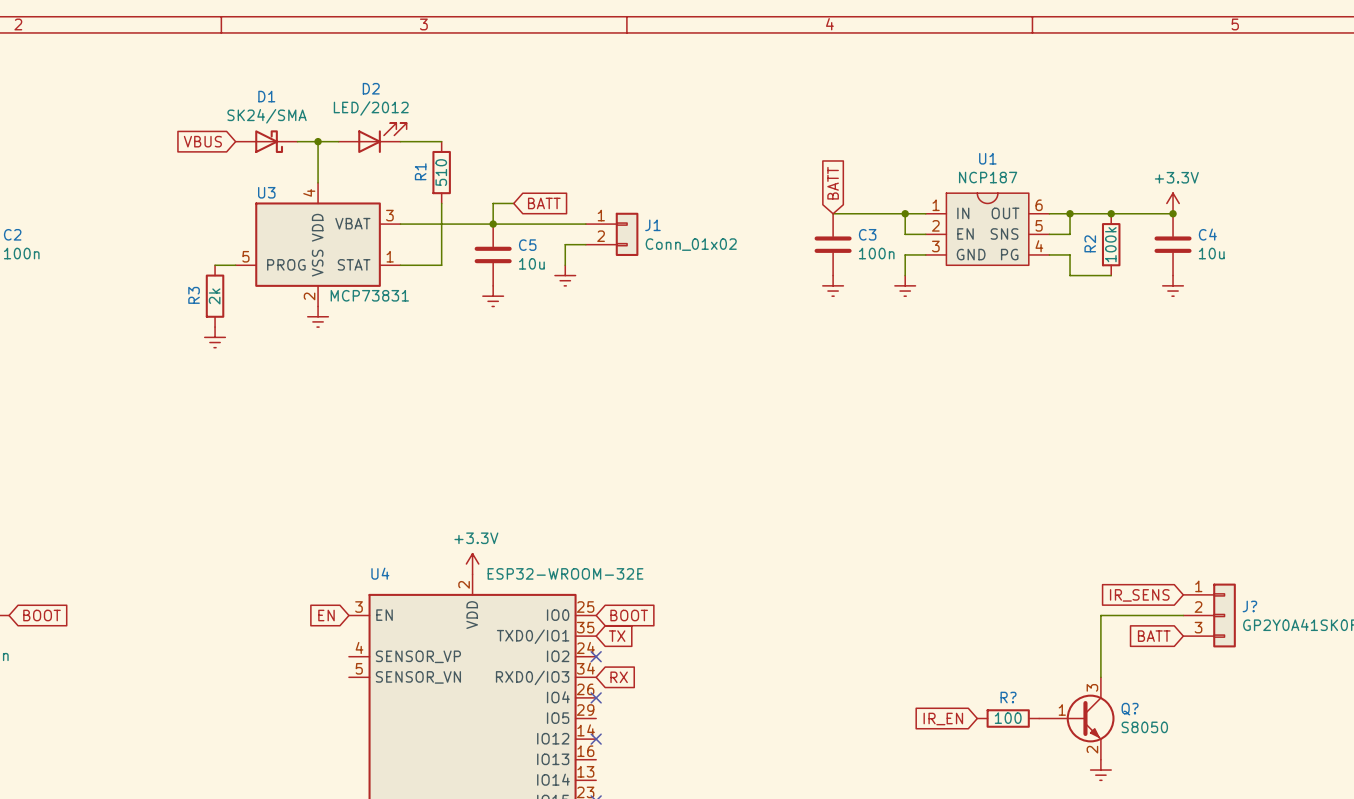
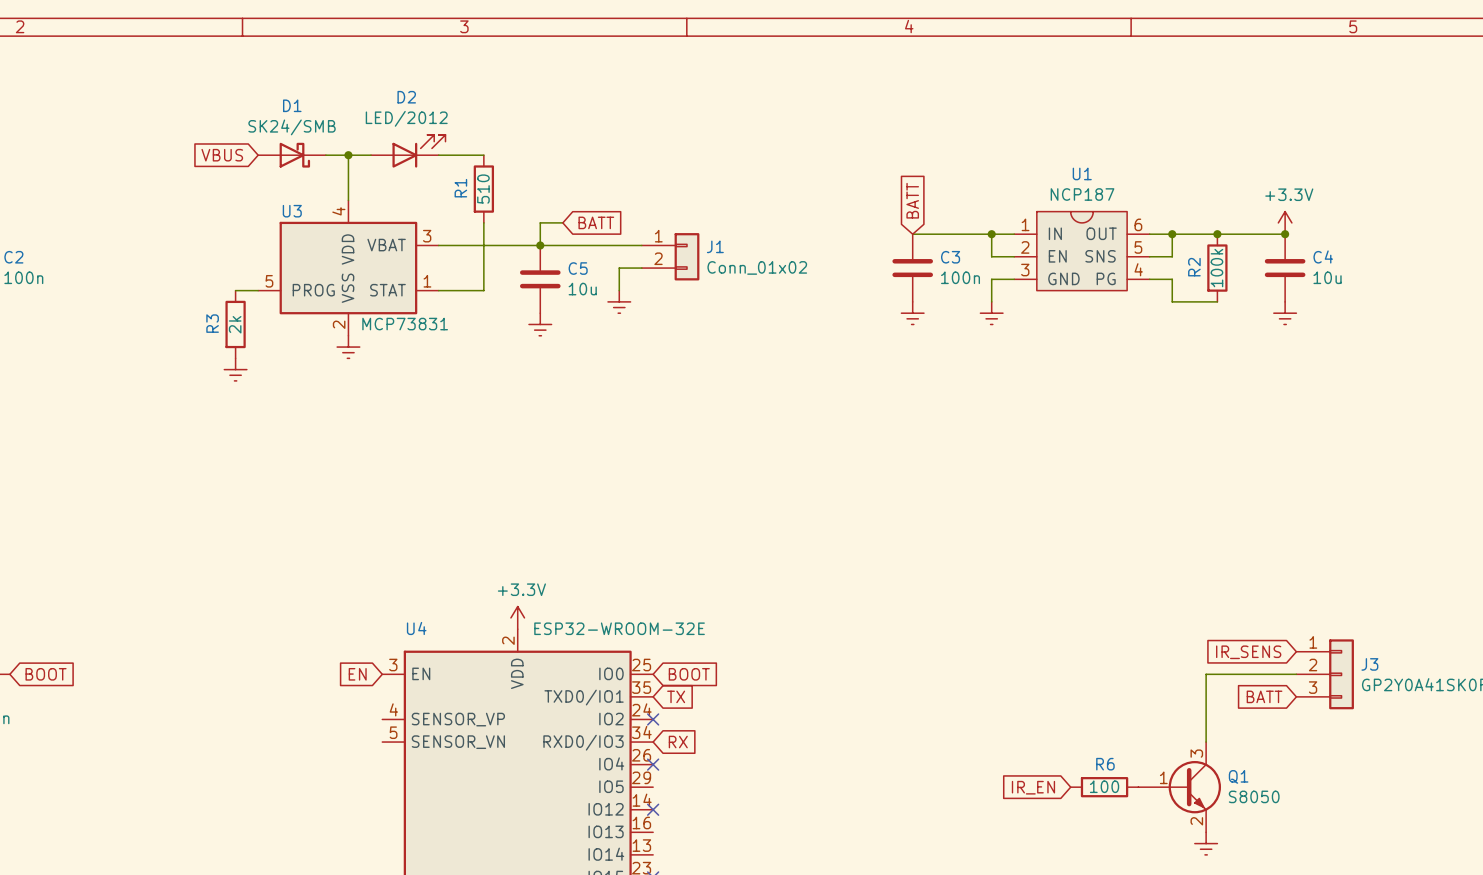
D1 value: SK24/SMA (267, 116) -> SK24/SMB (292, 127)
J? name: J? (1249, 606) -> J3 (1369, 664)
R? name: R? (1008, 697) -> R6 (1105, 764)
Q? name: Q? (1130, 709) -> Q1 (1238, 776)

